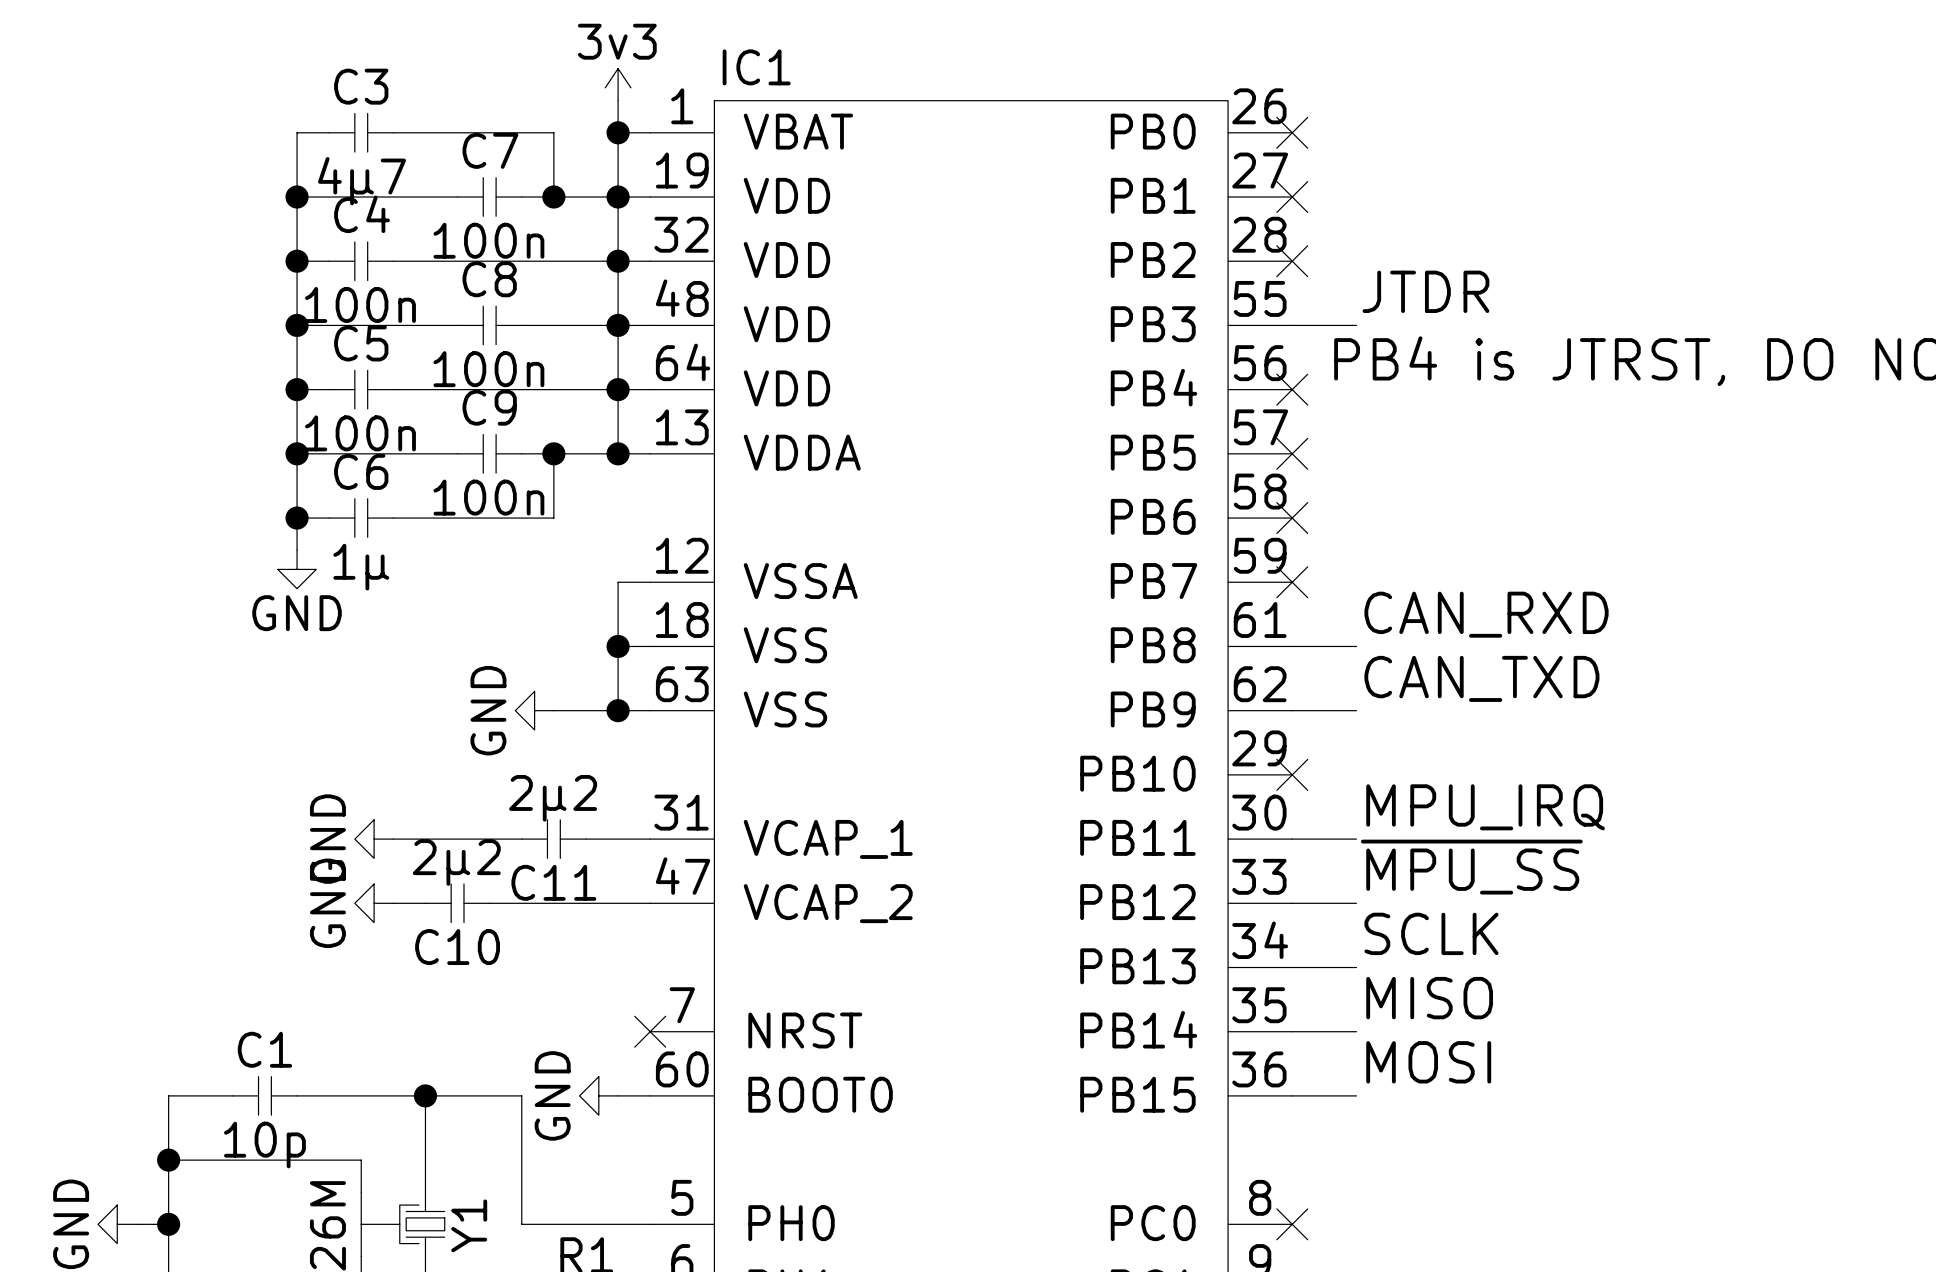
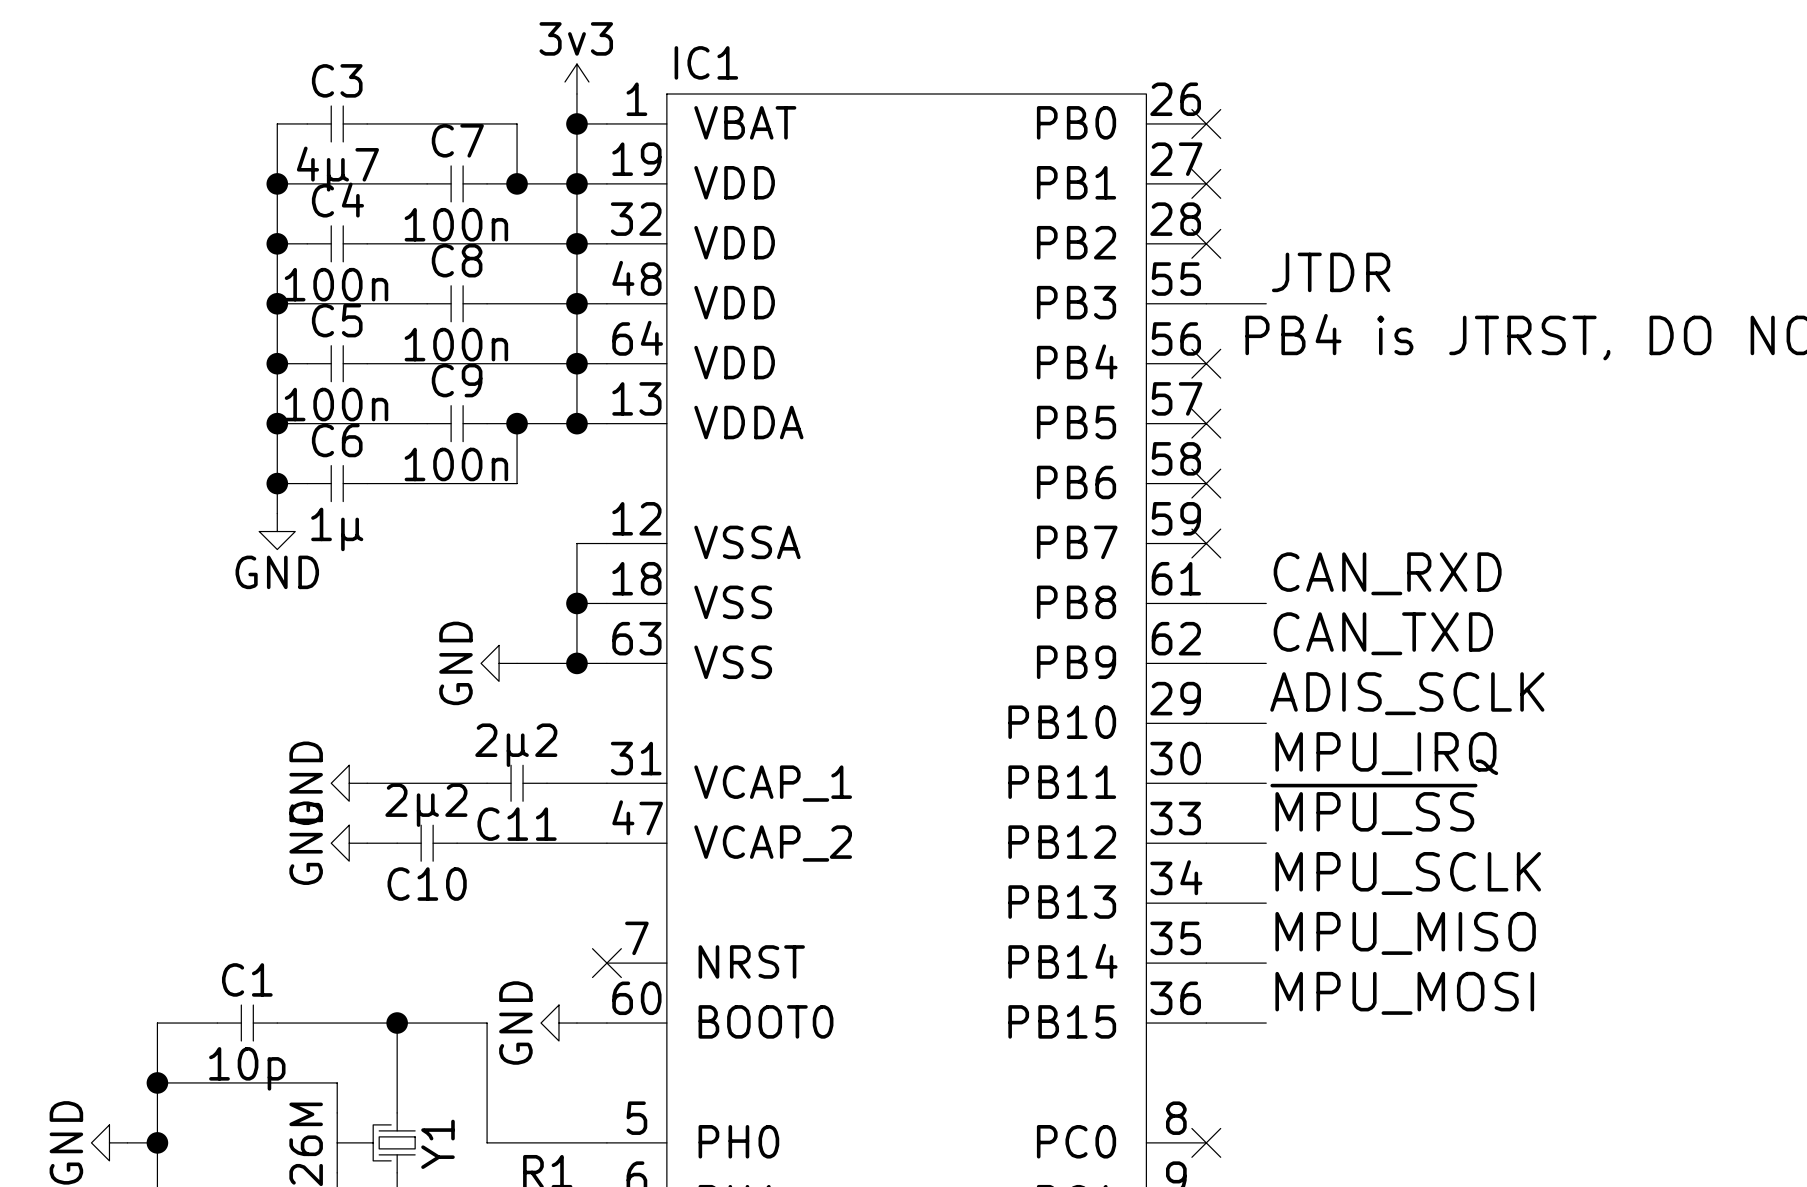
label: none -> ADIS_SCLK (1407, 693)
wire: none -> (1206, 723) (1266, 723)
no-connect mark: (1292, 774) -> none
label: SCLK (1431, 933) -> MPU_SCLK (1408, 873)
label: MISO (1429, 998) -> MPU_MISO (1405, 933)
label: MOSI (1428, 1062) -> MPU_MOSI (1404, 993)

